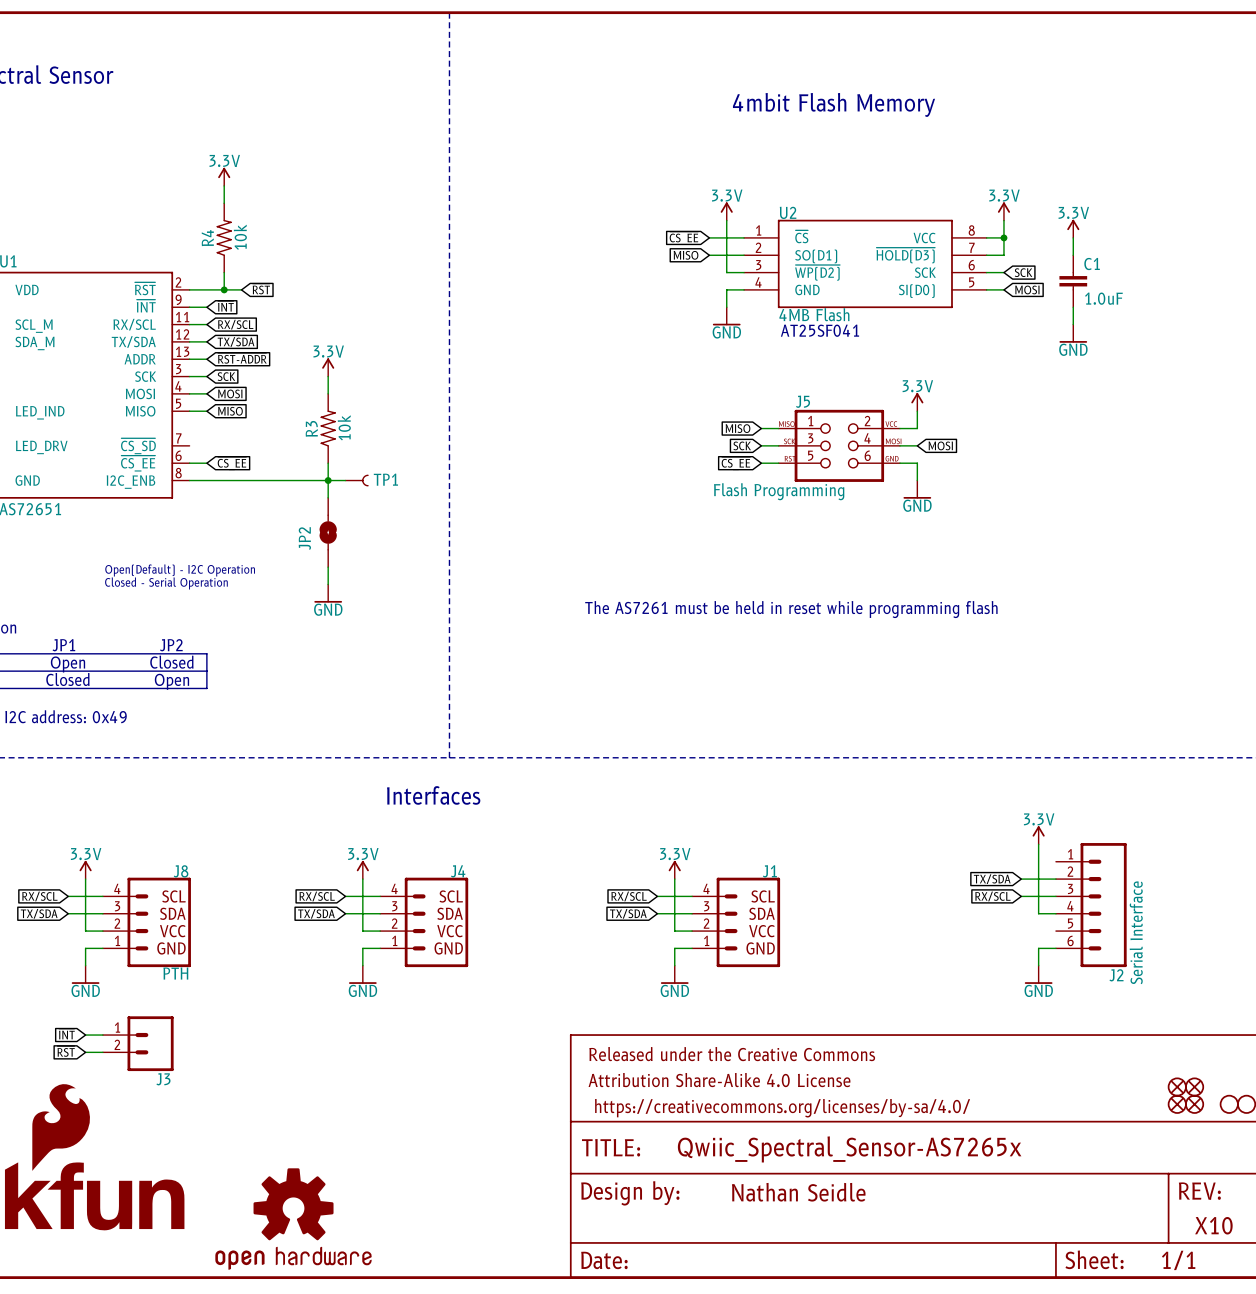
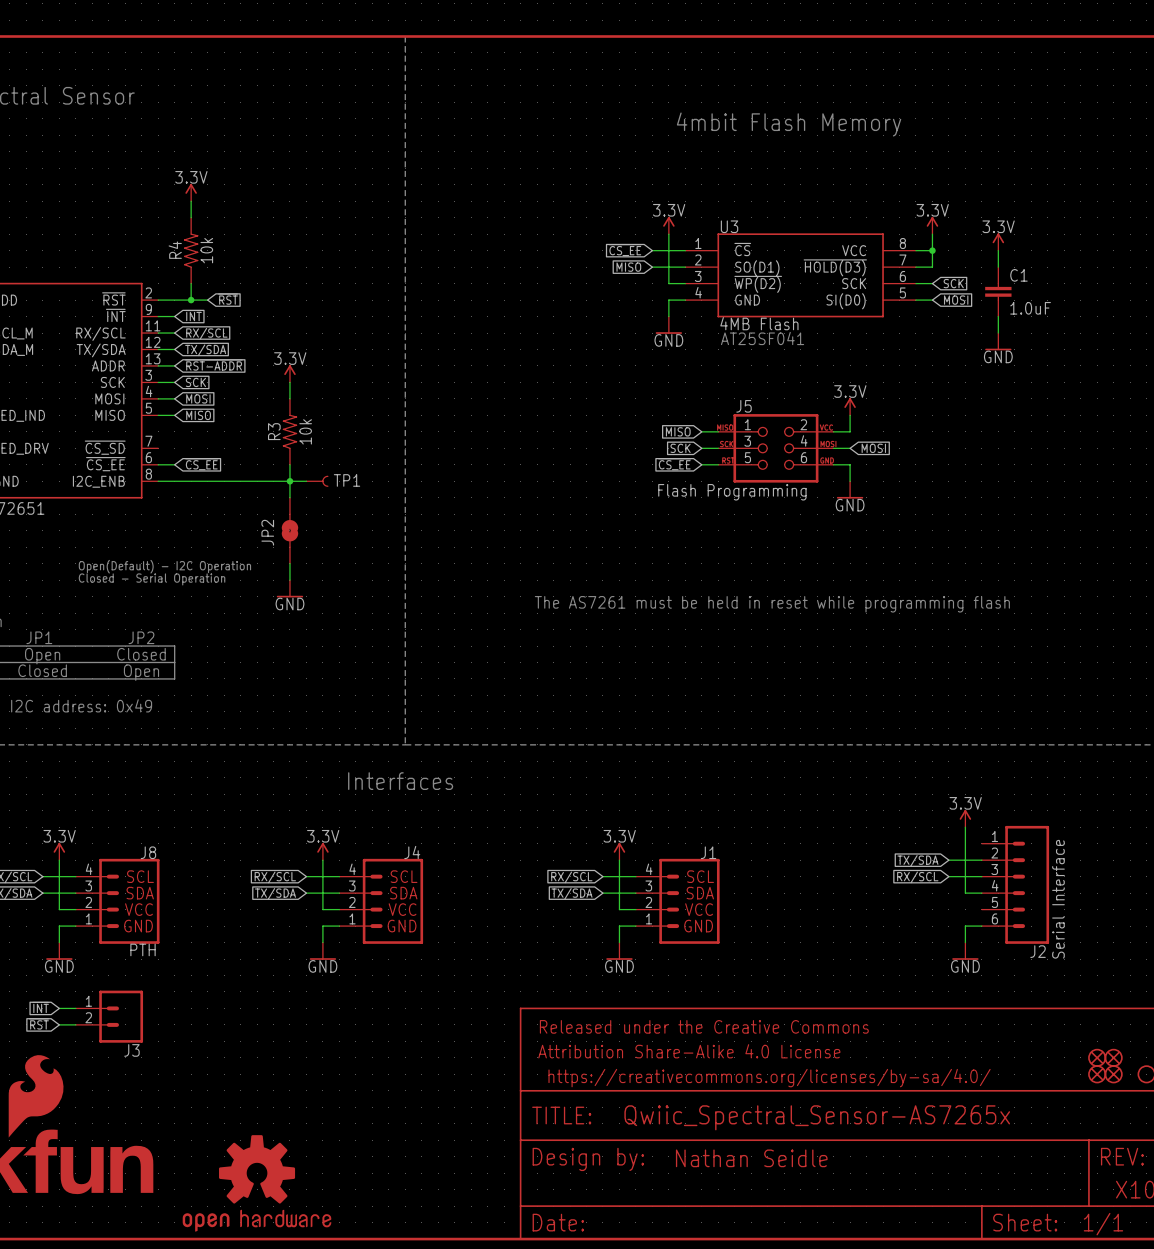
U2 name: U2 (788, 212) -> U3 (729, 226)

